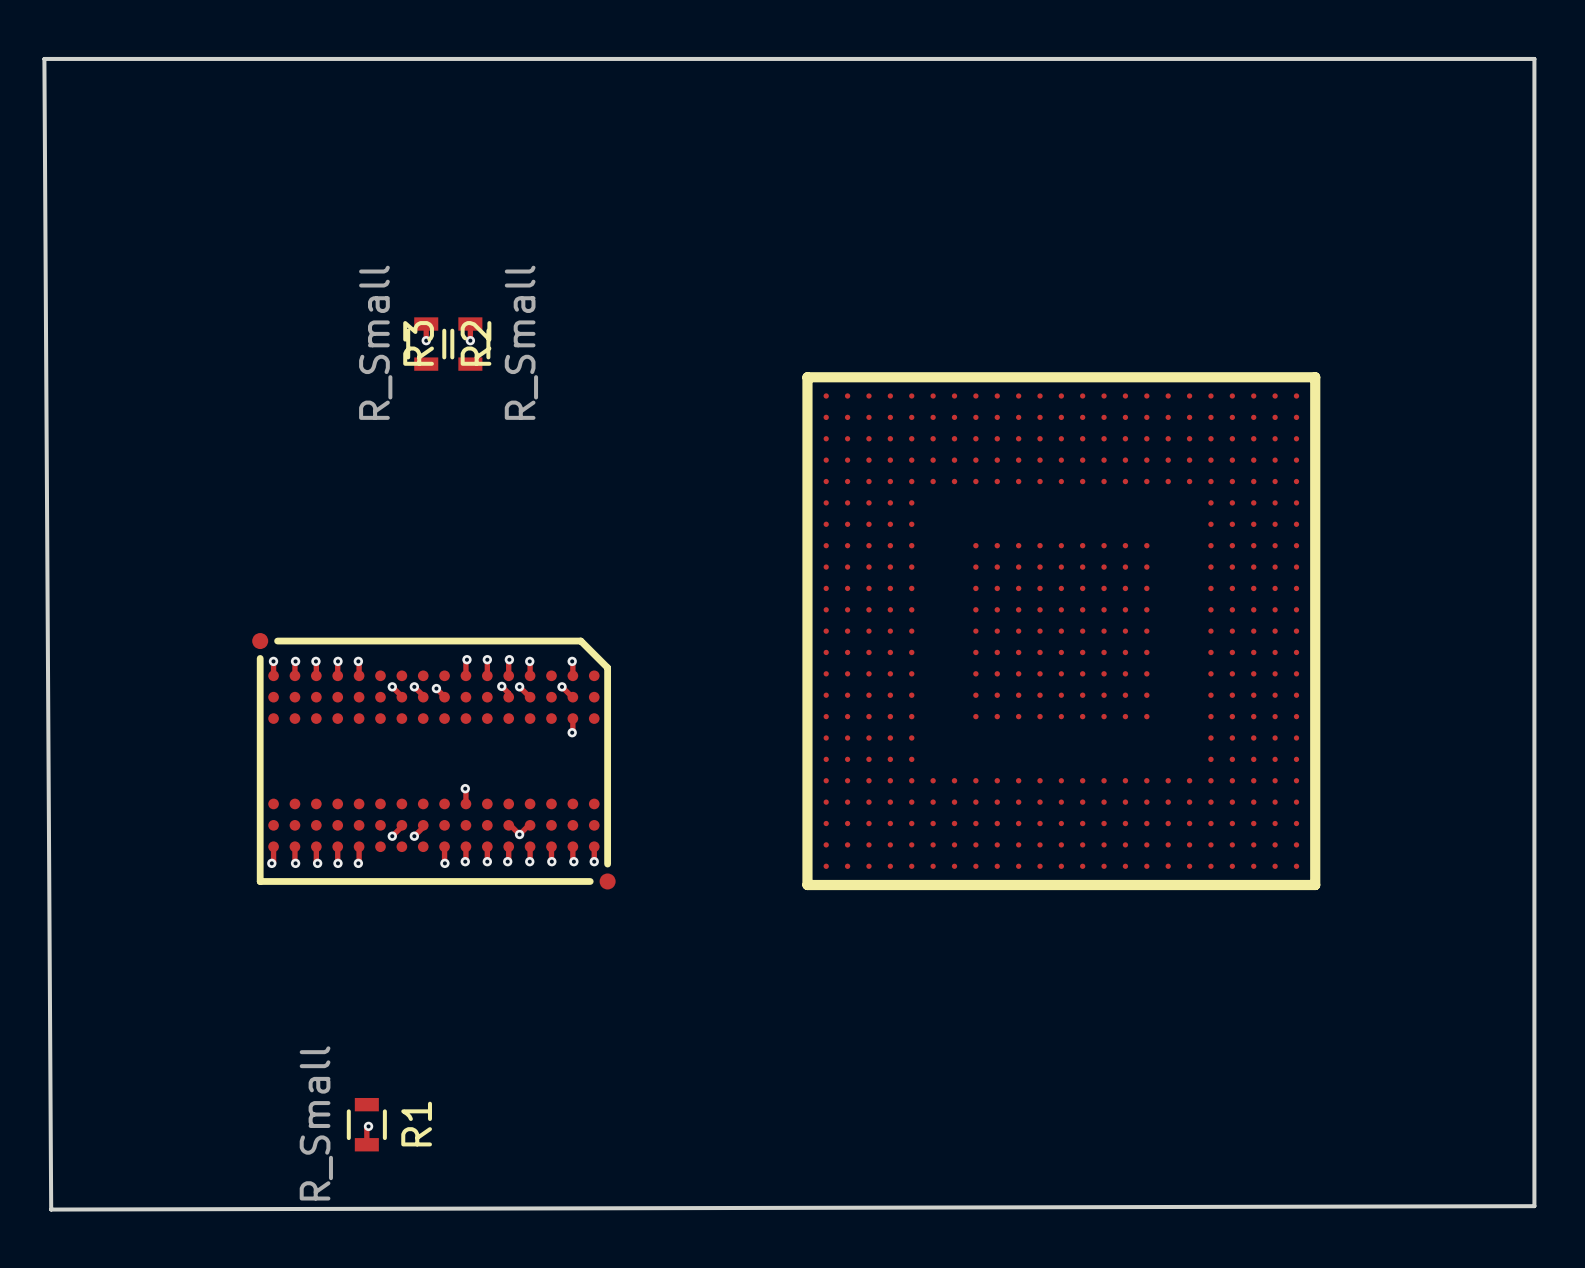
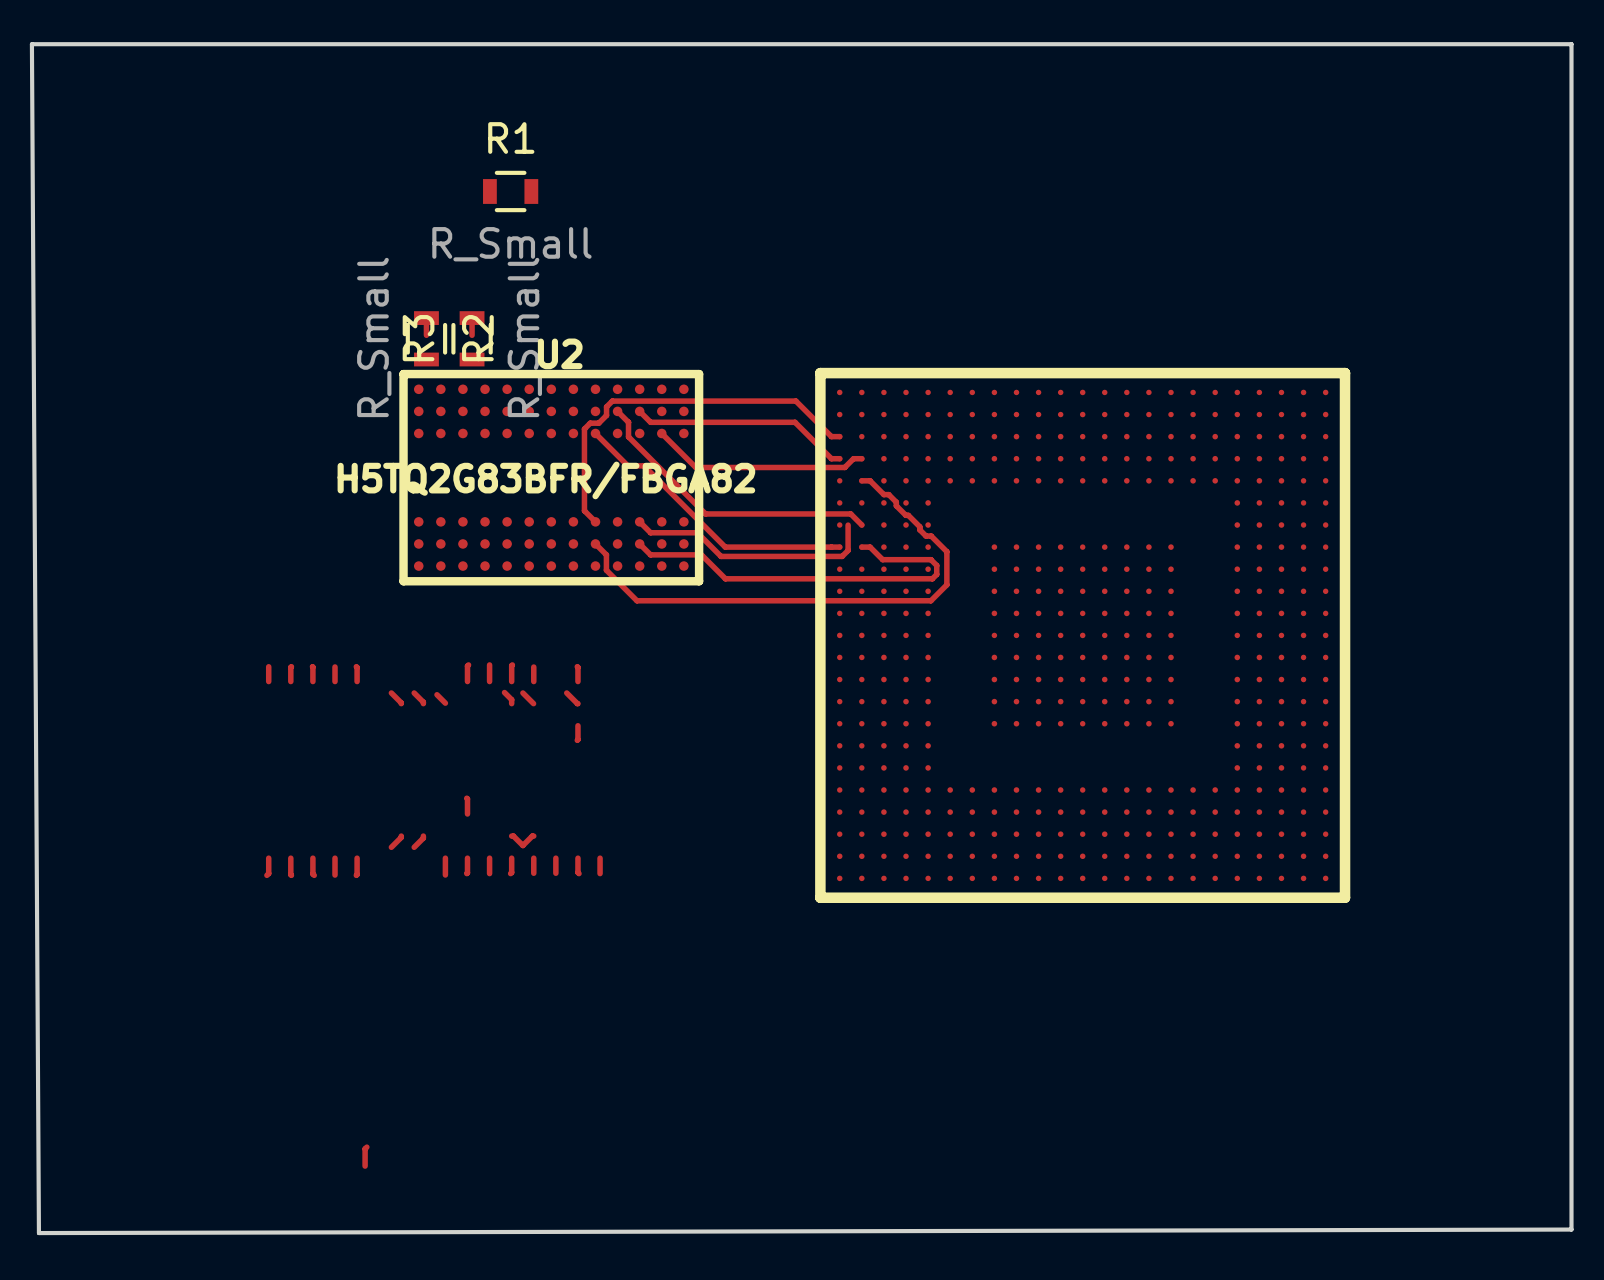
via: (426, 340) -> none
via: (470, 340) -> none
track: none -> (617, 411) (628, 422) (628, 436) (705, 513) (850, 513) (861, 525)
track: none -> (639, 411) (650, 422) (795, 422) (831, 458) (839, 458)
track: none -> (595, 433) (627, 465) (644, 465) (725, 547) (839, 547)
track: none -> (661, 433) (695, 467) (844, 467) (853, 458) (861, 458)
track: none -> (839, 436) (831, 436) (795, 401) (612, 401) (606, 406) (606, 415) (598, 423) (590, 423) (584, 428) (584, 510) (595, 521)
U2: none -> H5TQ2G83BFR/FBGA82 (551, 477)
track: none -> (861, 480) (870, 480) (883, 494) (888, 494) (896, 502) (896, 505) (919, 526) (919, 529) (926, 536) (931, 536) (946, 551) (946, 584) (930, 600) (636, 600) (606, 570) (606, 554) (595, 543)
track: none -> (639, 521) (650, 532) (697, 532) (721, 556) (842, 556) (848, 550) (848, 525)
track: none -> (639, 543) (650, 554) (701, 554) (725, 578) (932, 578) (936, 574) (936, 565) (930, 559) (882, 559) (870, 547) (861, 547)
via: (466, 659) -> none
via: (487, 659) -> none
via: (509, 659) -> none
via: (273, 661) -> none
via: (295, 661) -> none
via: (315, 661) -> none
via: (337, 661) -> none
via: (358, 661) -> none
via: (529, 661) -> none
via: (572, 661) -> none
via: (392, 686) -> none
via: (414, 686) -> none
via: (501, 686) -> none
via: (519, 686) -> none
via: (562, 686) -> none
via: (436, 688) -> none
via: (572, 732) -> none
part: (433, 761) -> none
via: (465, 788) -> none
via: (519, 834) -> none
via: (392, 836) -> none
via: (414, 836) -> none
via: (465, 861) -> none
via: (487, 861) -> none
via: (507, 861) -> none
via: (529, 861) -> none
via: (551, 861) -> none
via: (573, 861) -> none
via: (594, 861) -> none
via: (271, 863) -> none
via: (295, 863) -> none
via: (317, 863) -> none
via: (337, 863) -> none
via: (358, 863) -> none
via: (444, 863) -> none
R1 value position: R_Small (316, 1123) -> R_Small (511, 244)
R1 rotation: 0° (366, 1124) -> 90° clockwise (510, 191)
R1 position: (366, 1124) -> (510, 191)
R1 name position: R1 (416, 1124) -> R1 (511, 137)
via: (368, 1126) -> none

